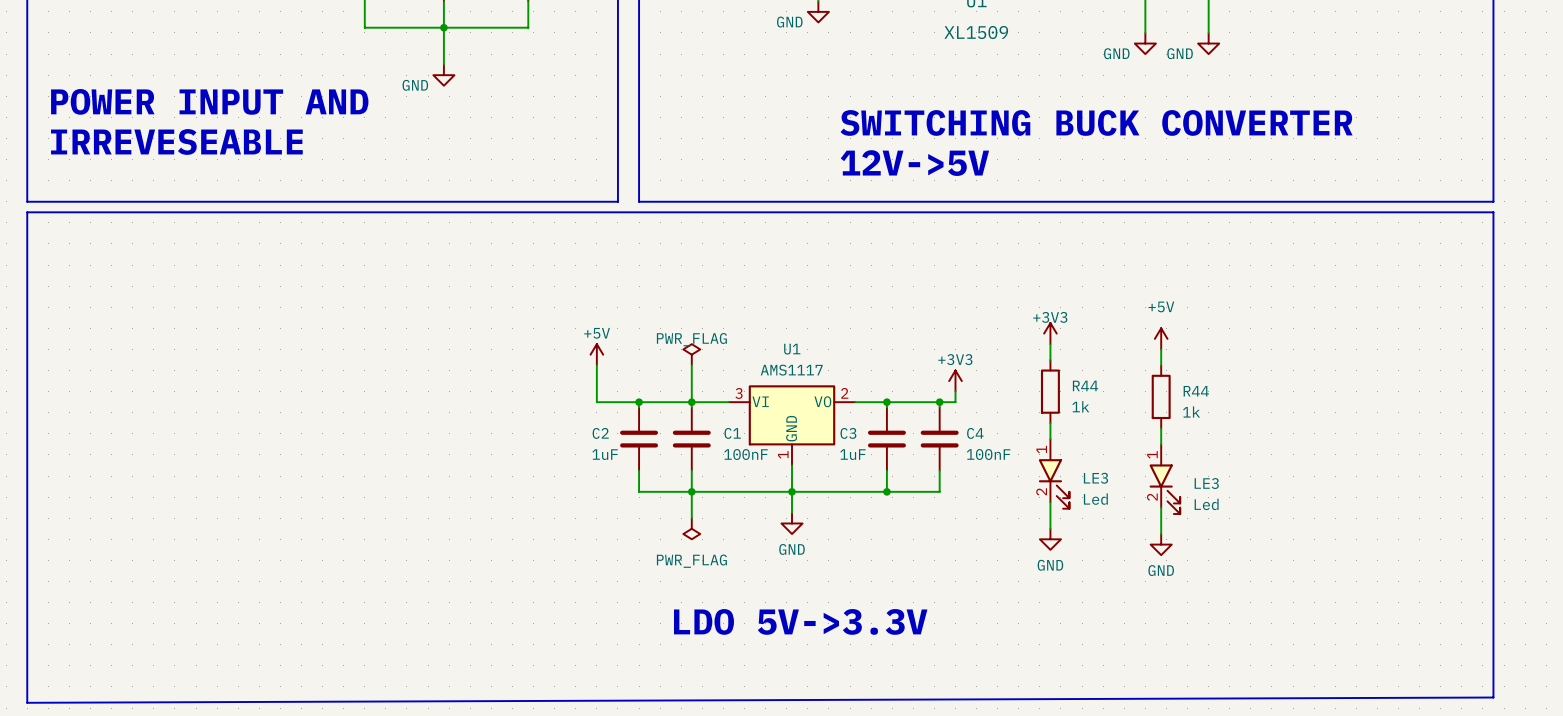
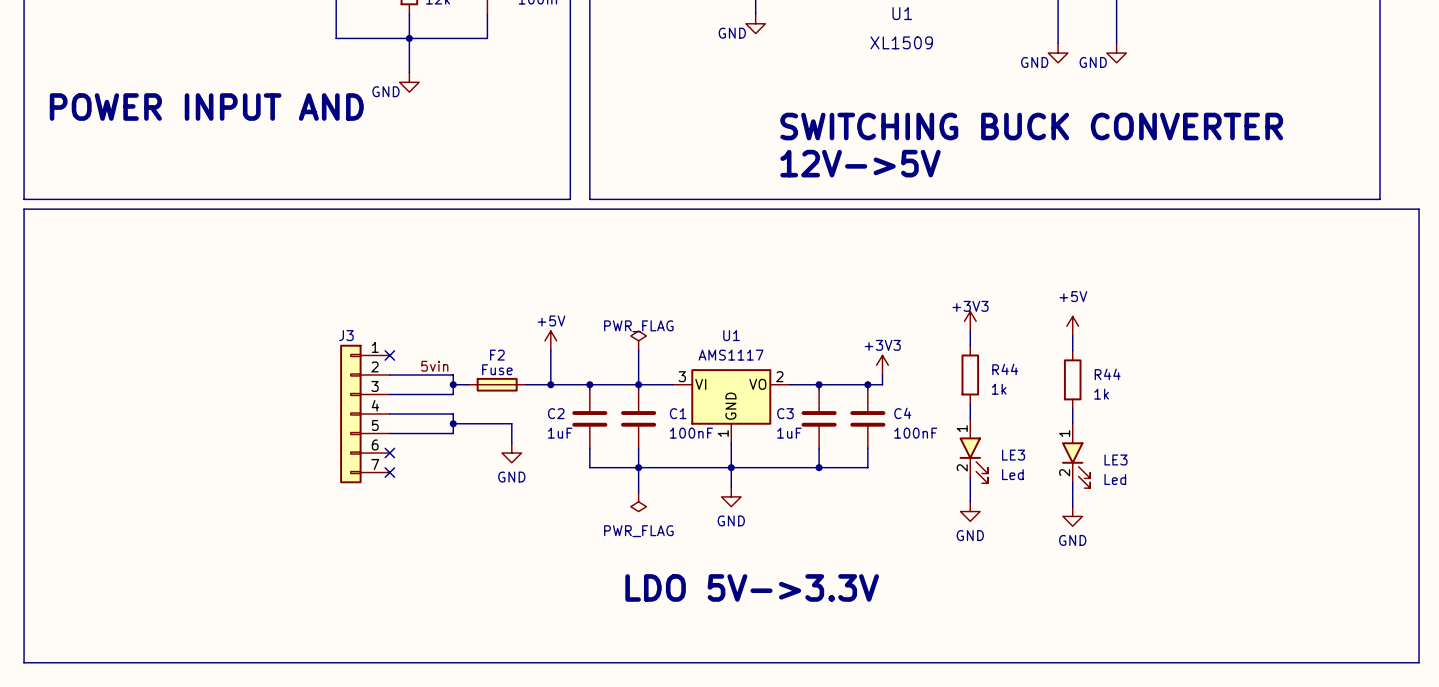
text: IRREVESEABLE (176, 141) -> none
line: (1493, 212) (1493, 697) (27, 702) -> (1380, 209) (1419, 209) (1419, 662) (24, 662)
no-connect mark: none -> (389, 355)
label: none -> 5vin (434, 366)
wire: none -> (389, 374) (453, 374) (453, 394) (389, 394)
wire: none -> (453, 384) (467, 384)
junction: none -> (453, 384)
F2: none -> Fuse (497, 384)
wire: none -> (526, 384) (550, 384)
junction: none -> (550, 384)
J3: none -> (364, 414)
wire: none -> (389, 414) (453, 414) (453, 433) (389, 433)
wire: none -> (453, 423) (511, 423) (511, 443)
junction: none -> (453, 423)
no-connect mark: none -> (389, 453)
power symbol: none -> GND (511, 453)
no-connect mark: none -> (389, 472)

